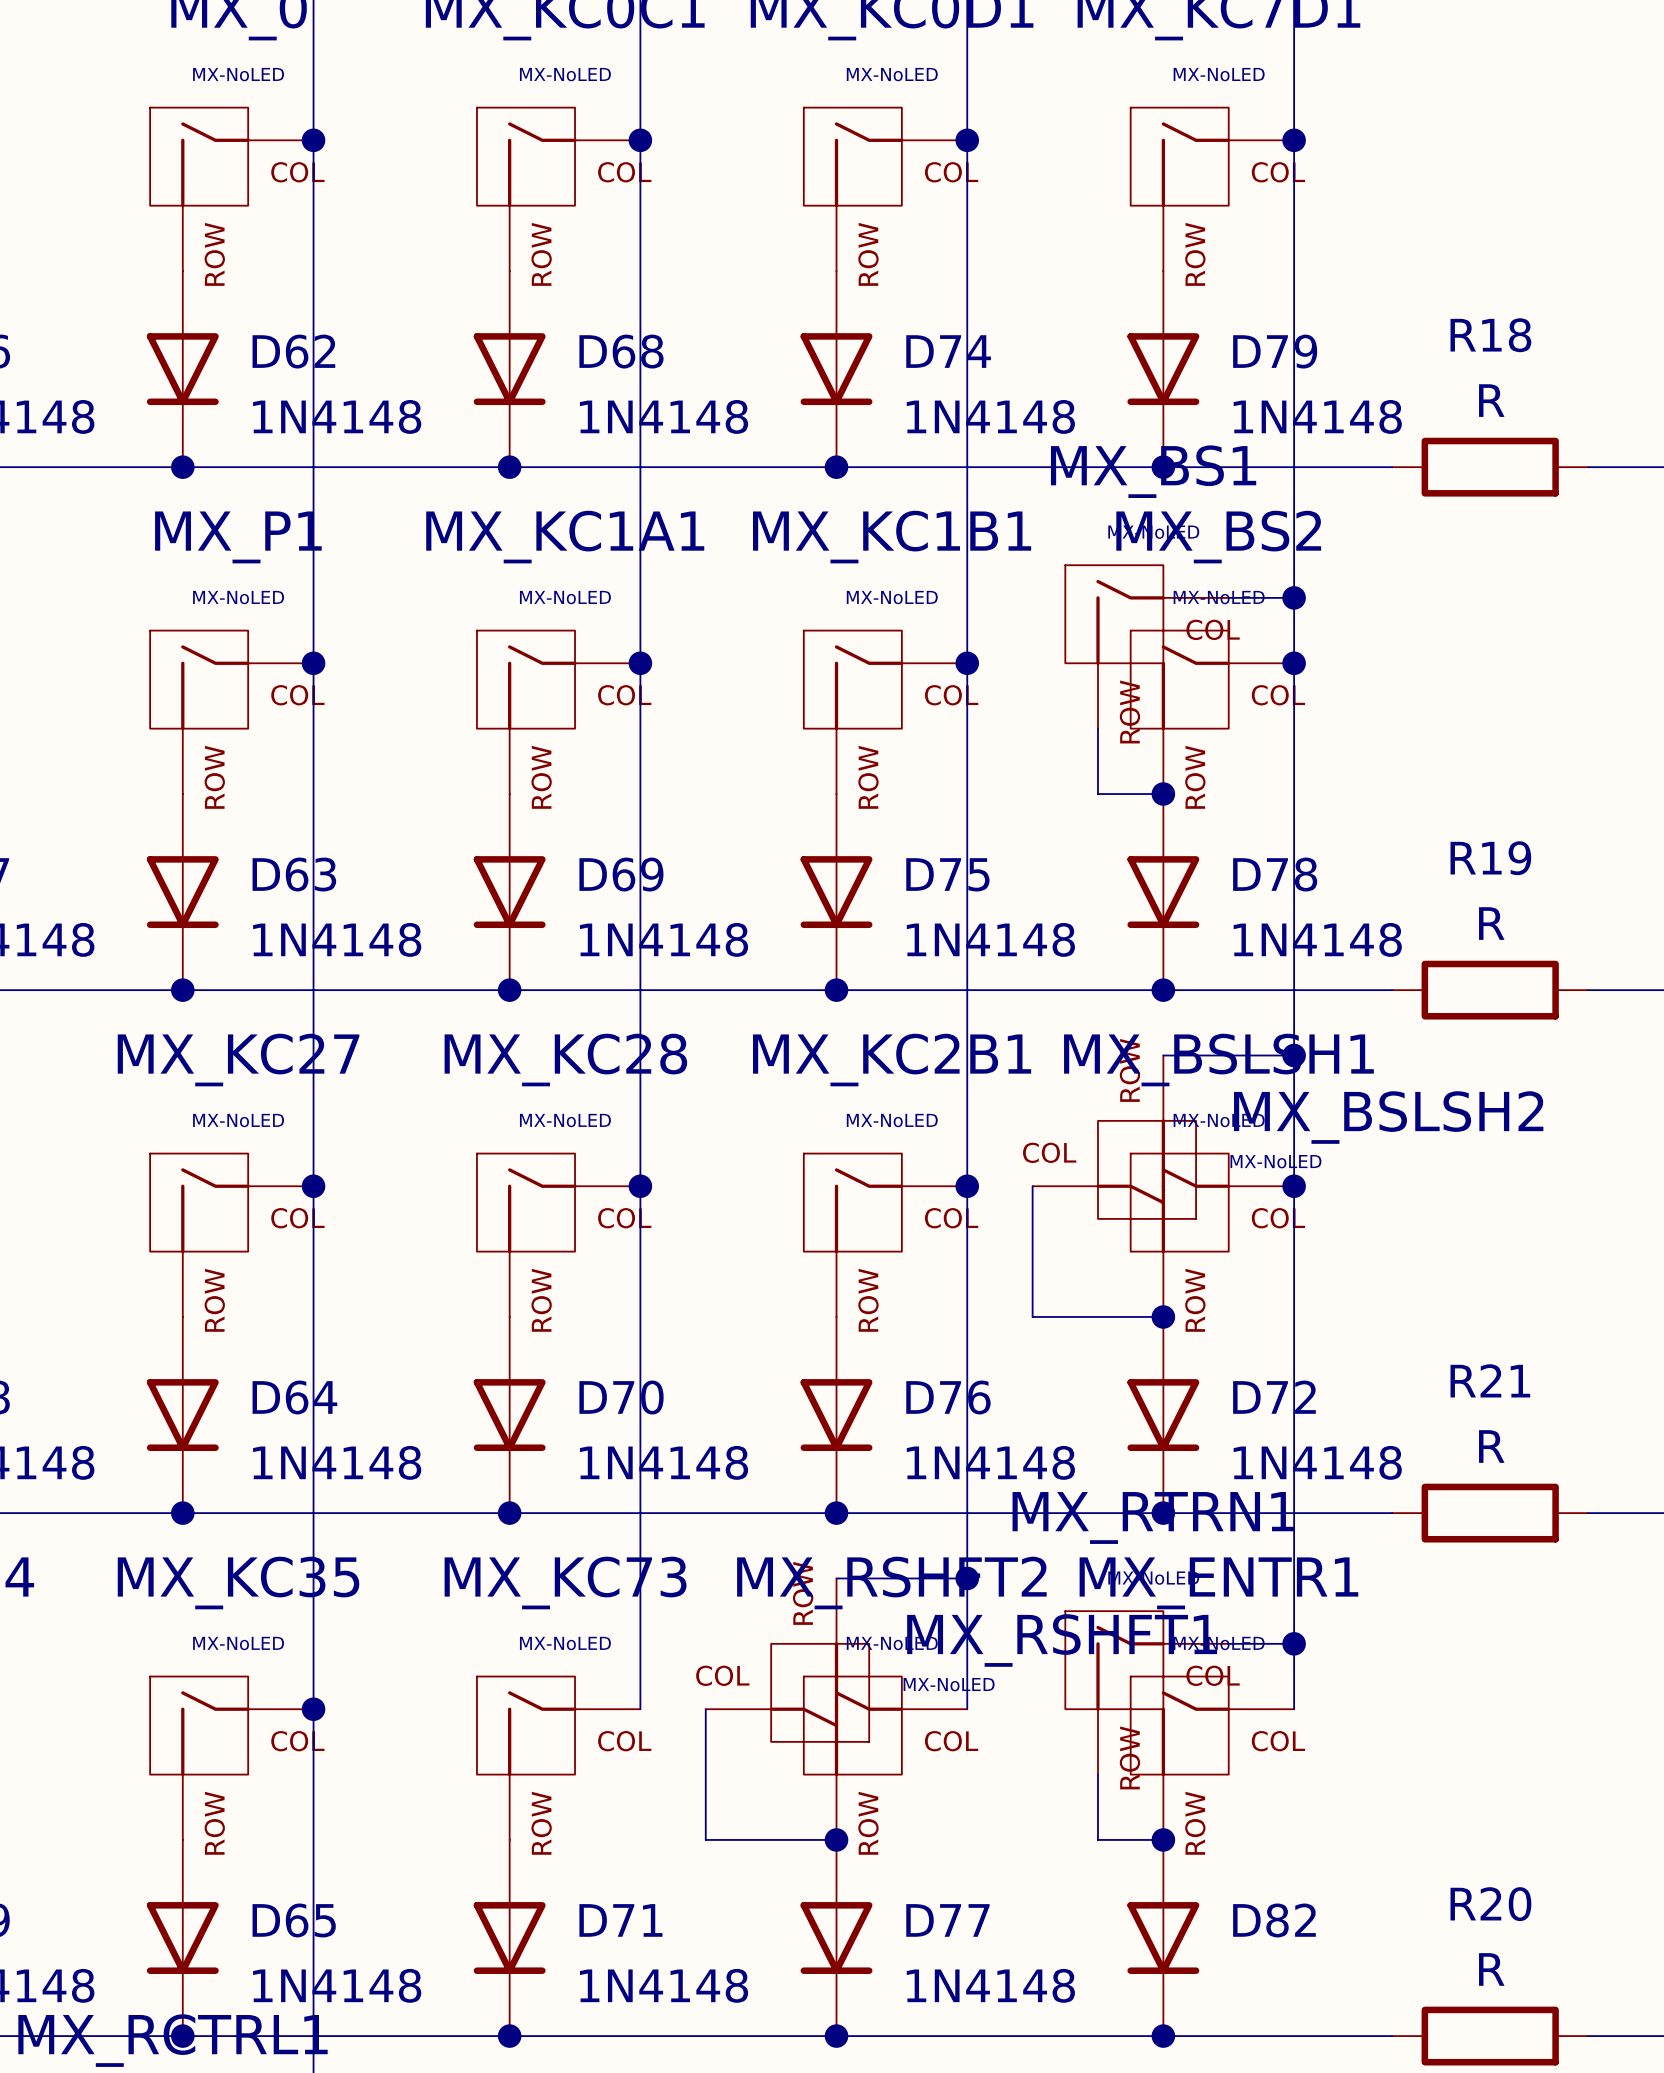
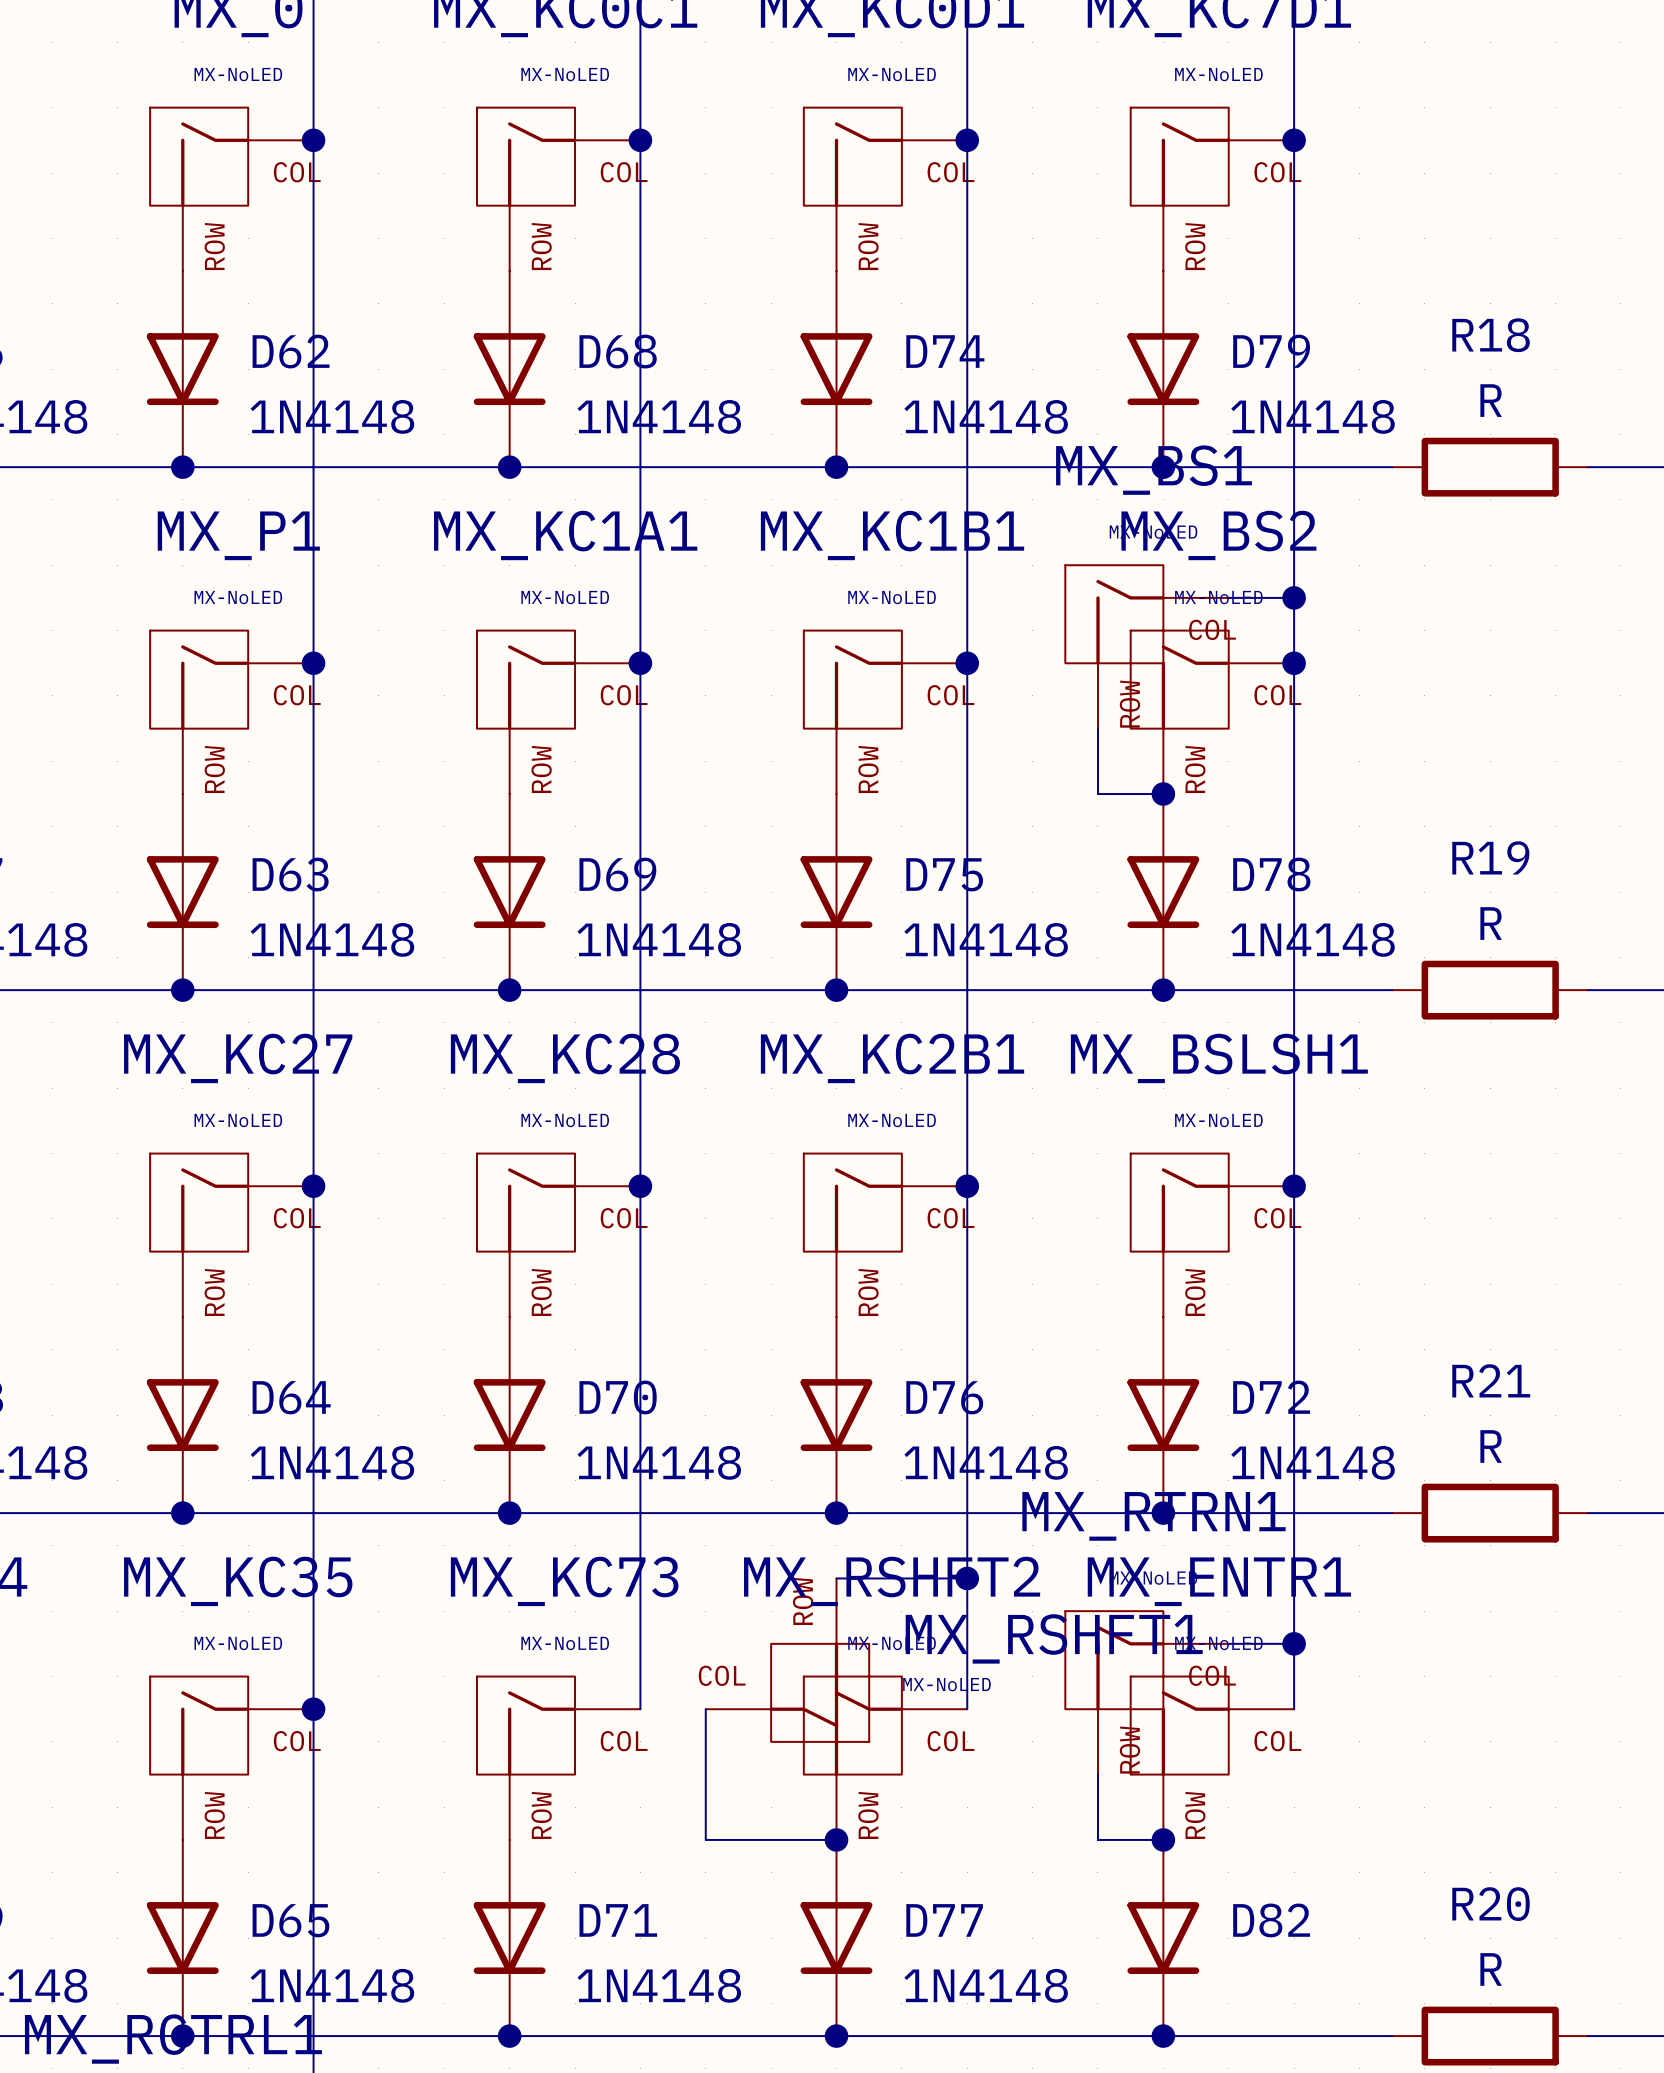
wire: (1163, 1055) (1294, 1055) -> none
junction: (1294, 1055) -> none
MX_BSLSH2: MX-NoLED (1114, 1137) -> none
wire: (1032, 1186) (1032, 1316) (1163, 1316) -> none
junction: (1163, 1316) -> none

